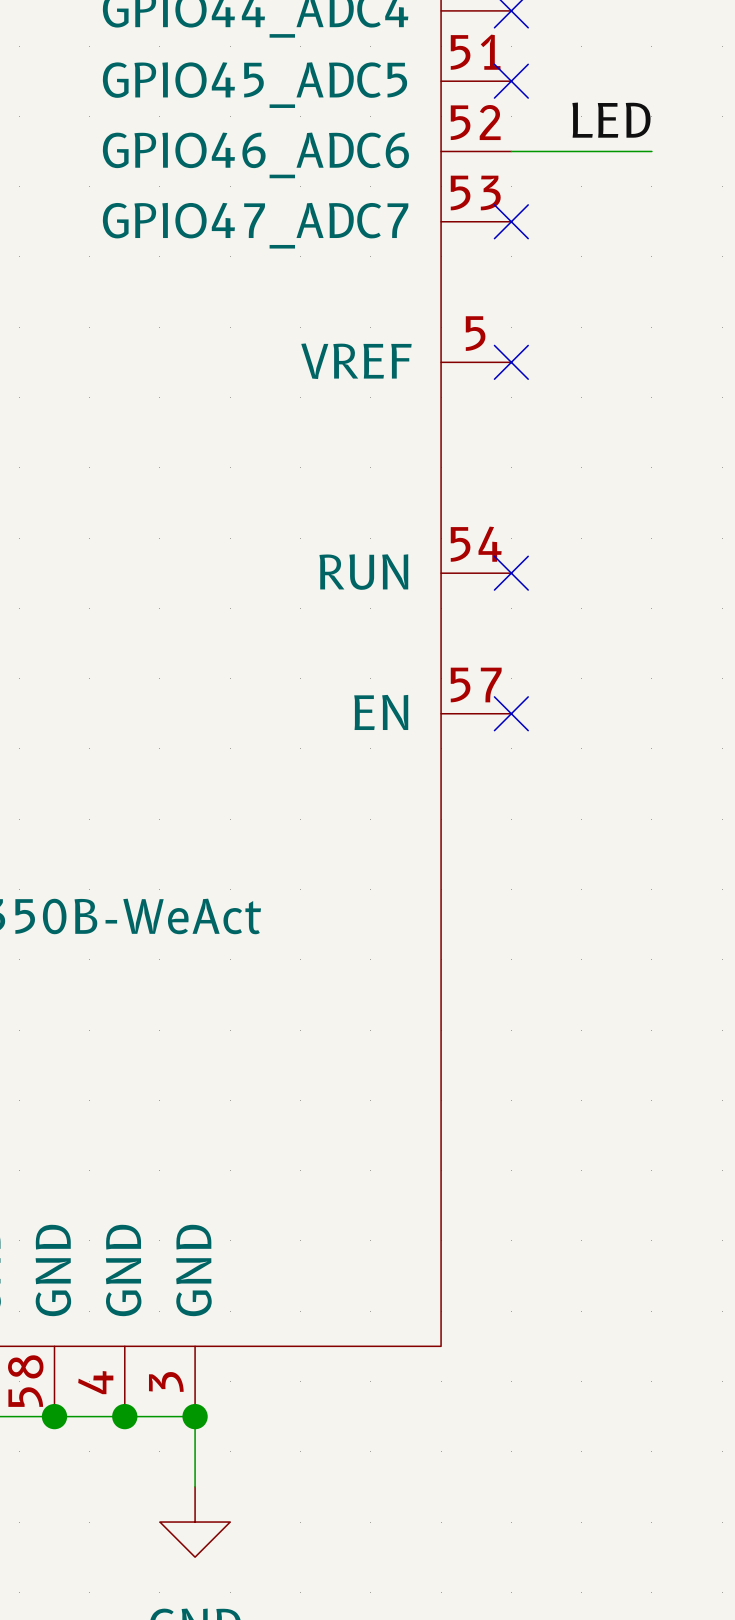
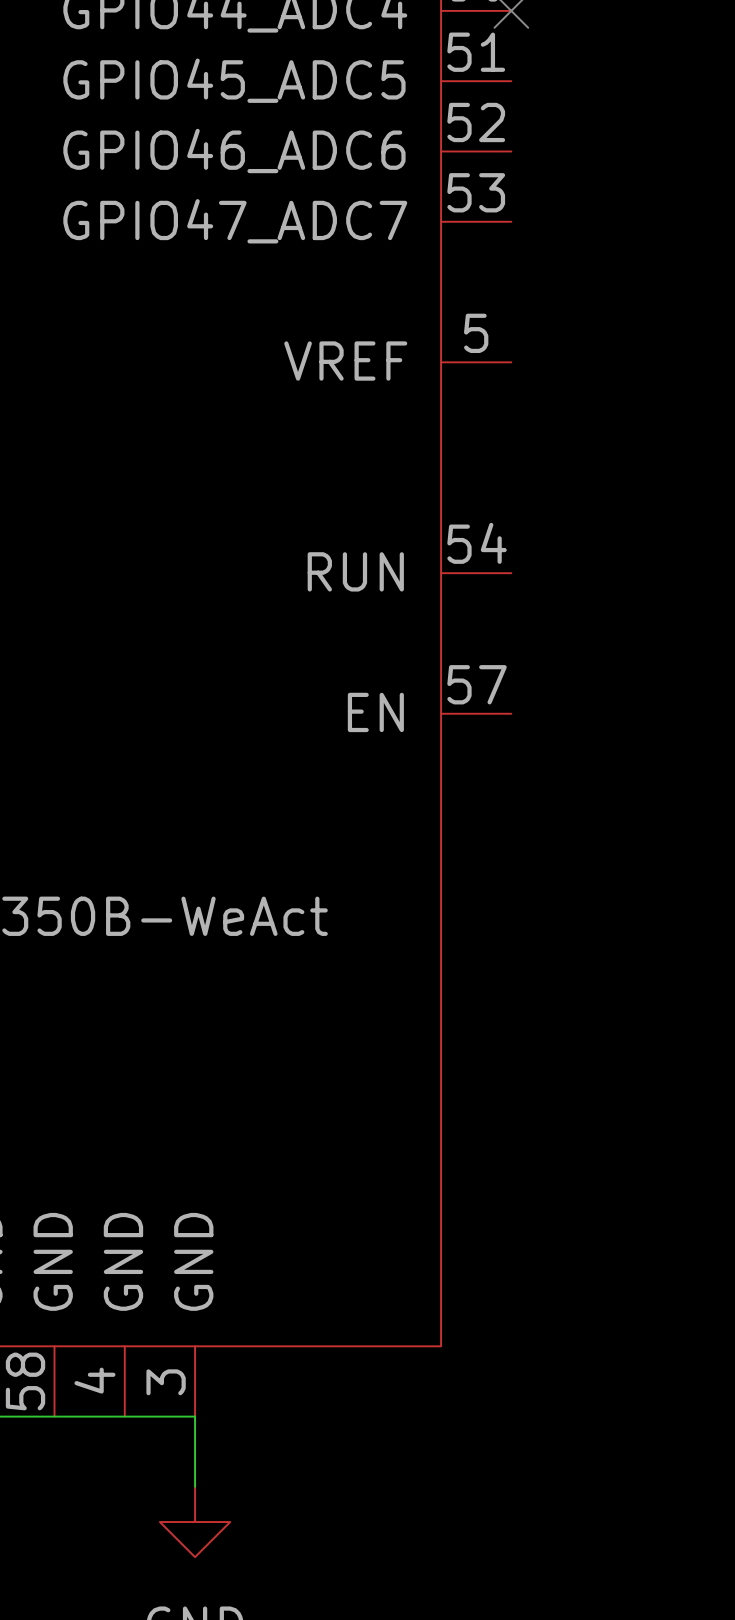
no-connect mark: (511, 81) -> none
label: LED (611, 120) -> none
wire: (511, 151) (651, 151) -> none
no-connect mark: (511, 221) -> none
no-connect mark: (511, 362) -> none
no-connect mark: (511, 573) -> none
no-connect mark: (511, 713) -> none
junction: (54, 1416) -> none
junction: (124, 1416) -> none
junction: (195, 1416) -> none

